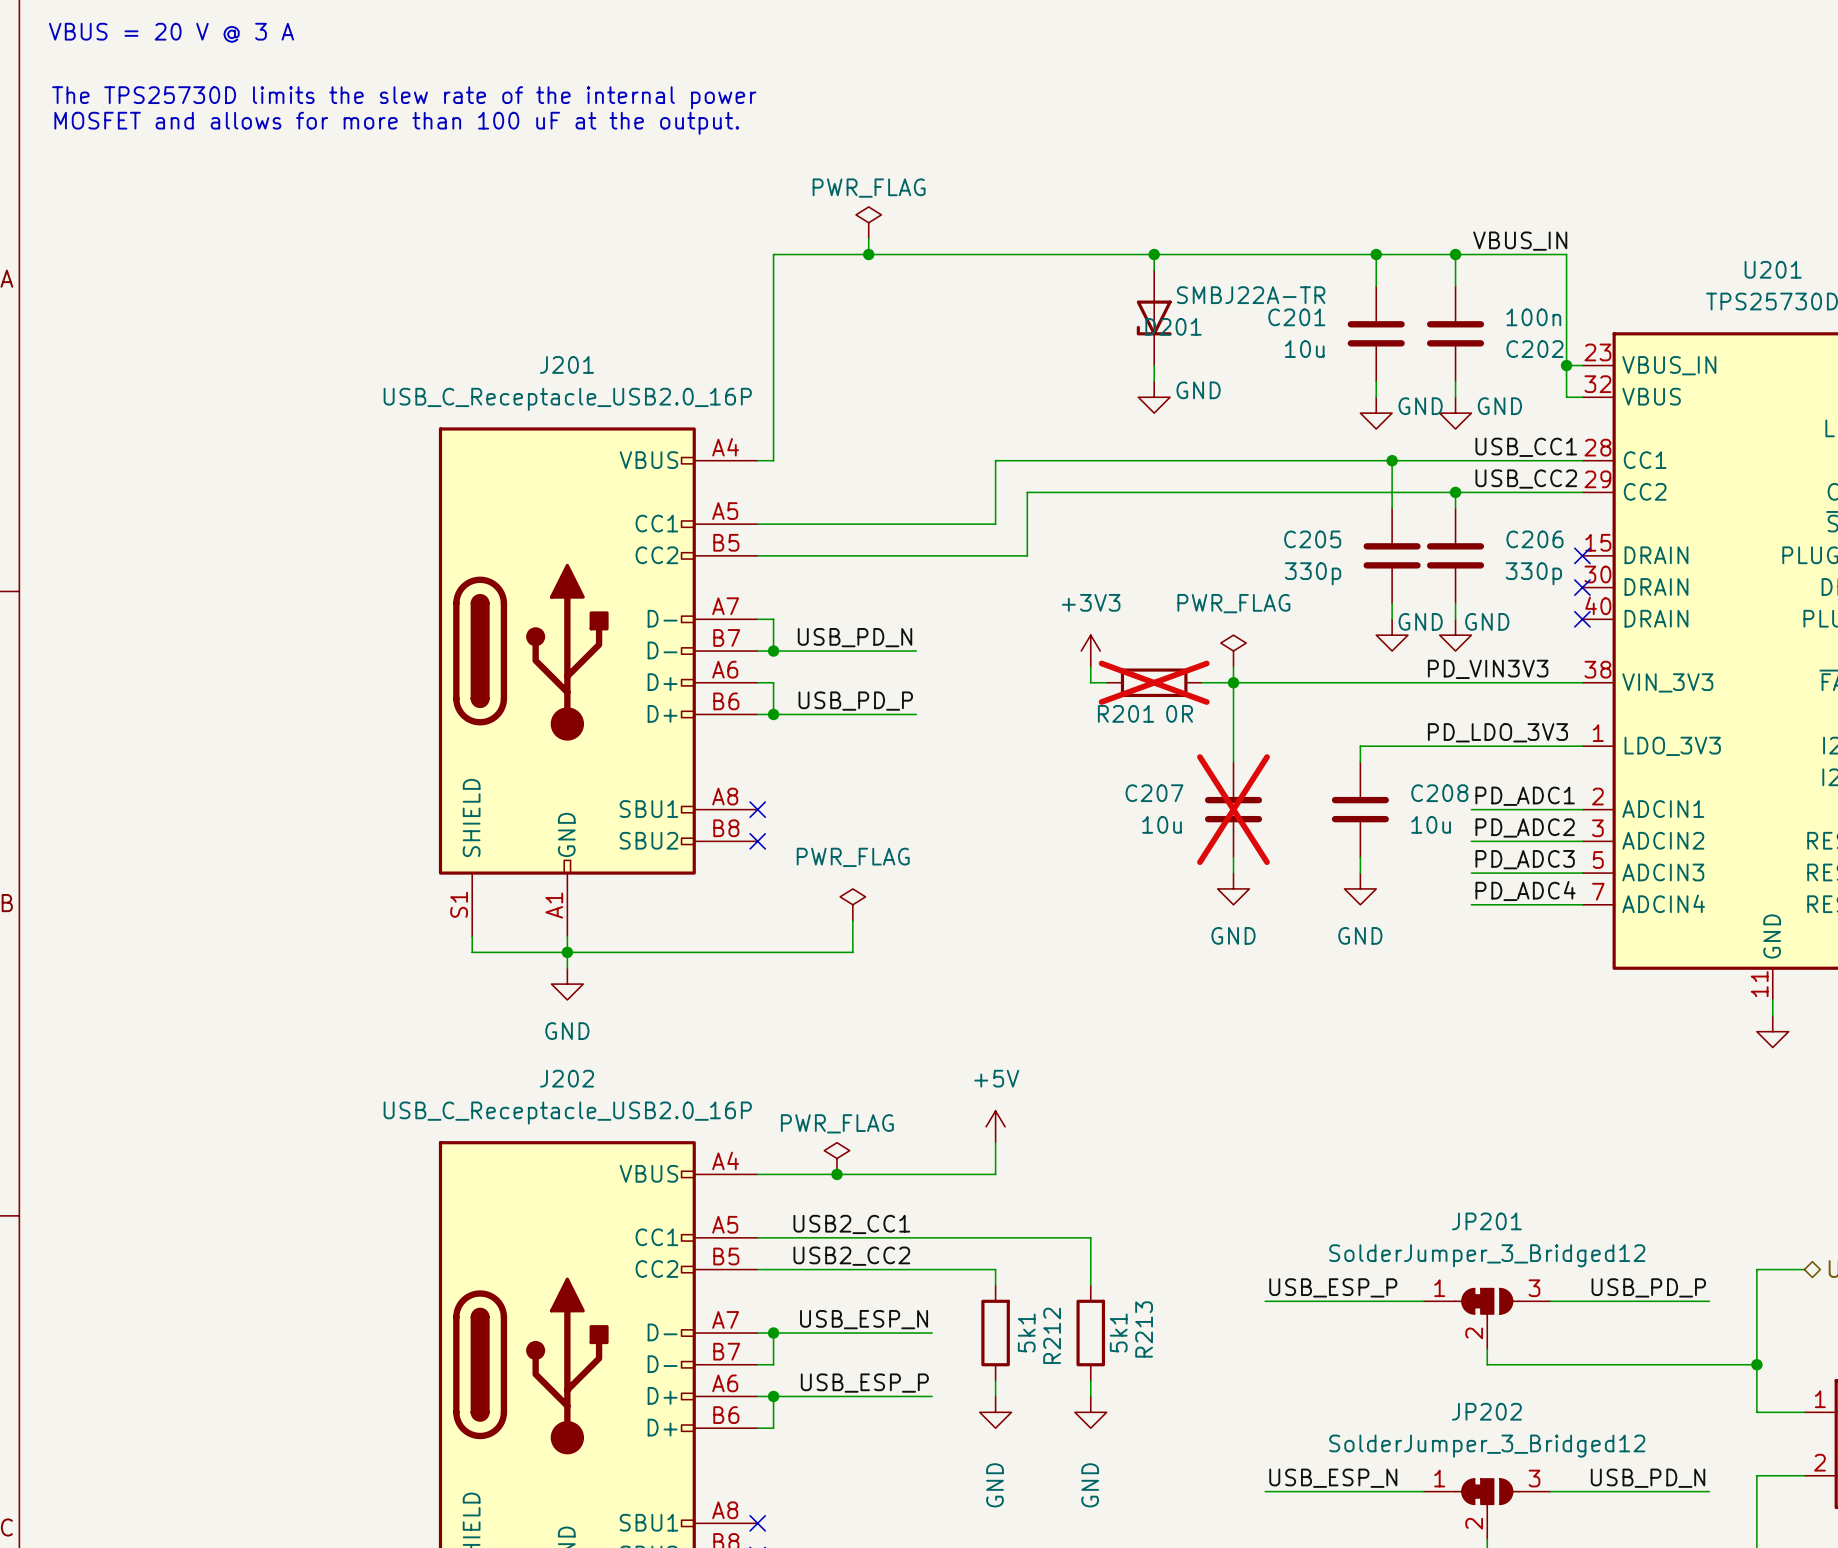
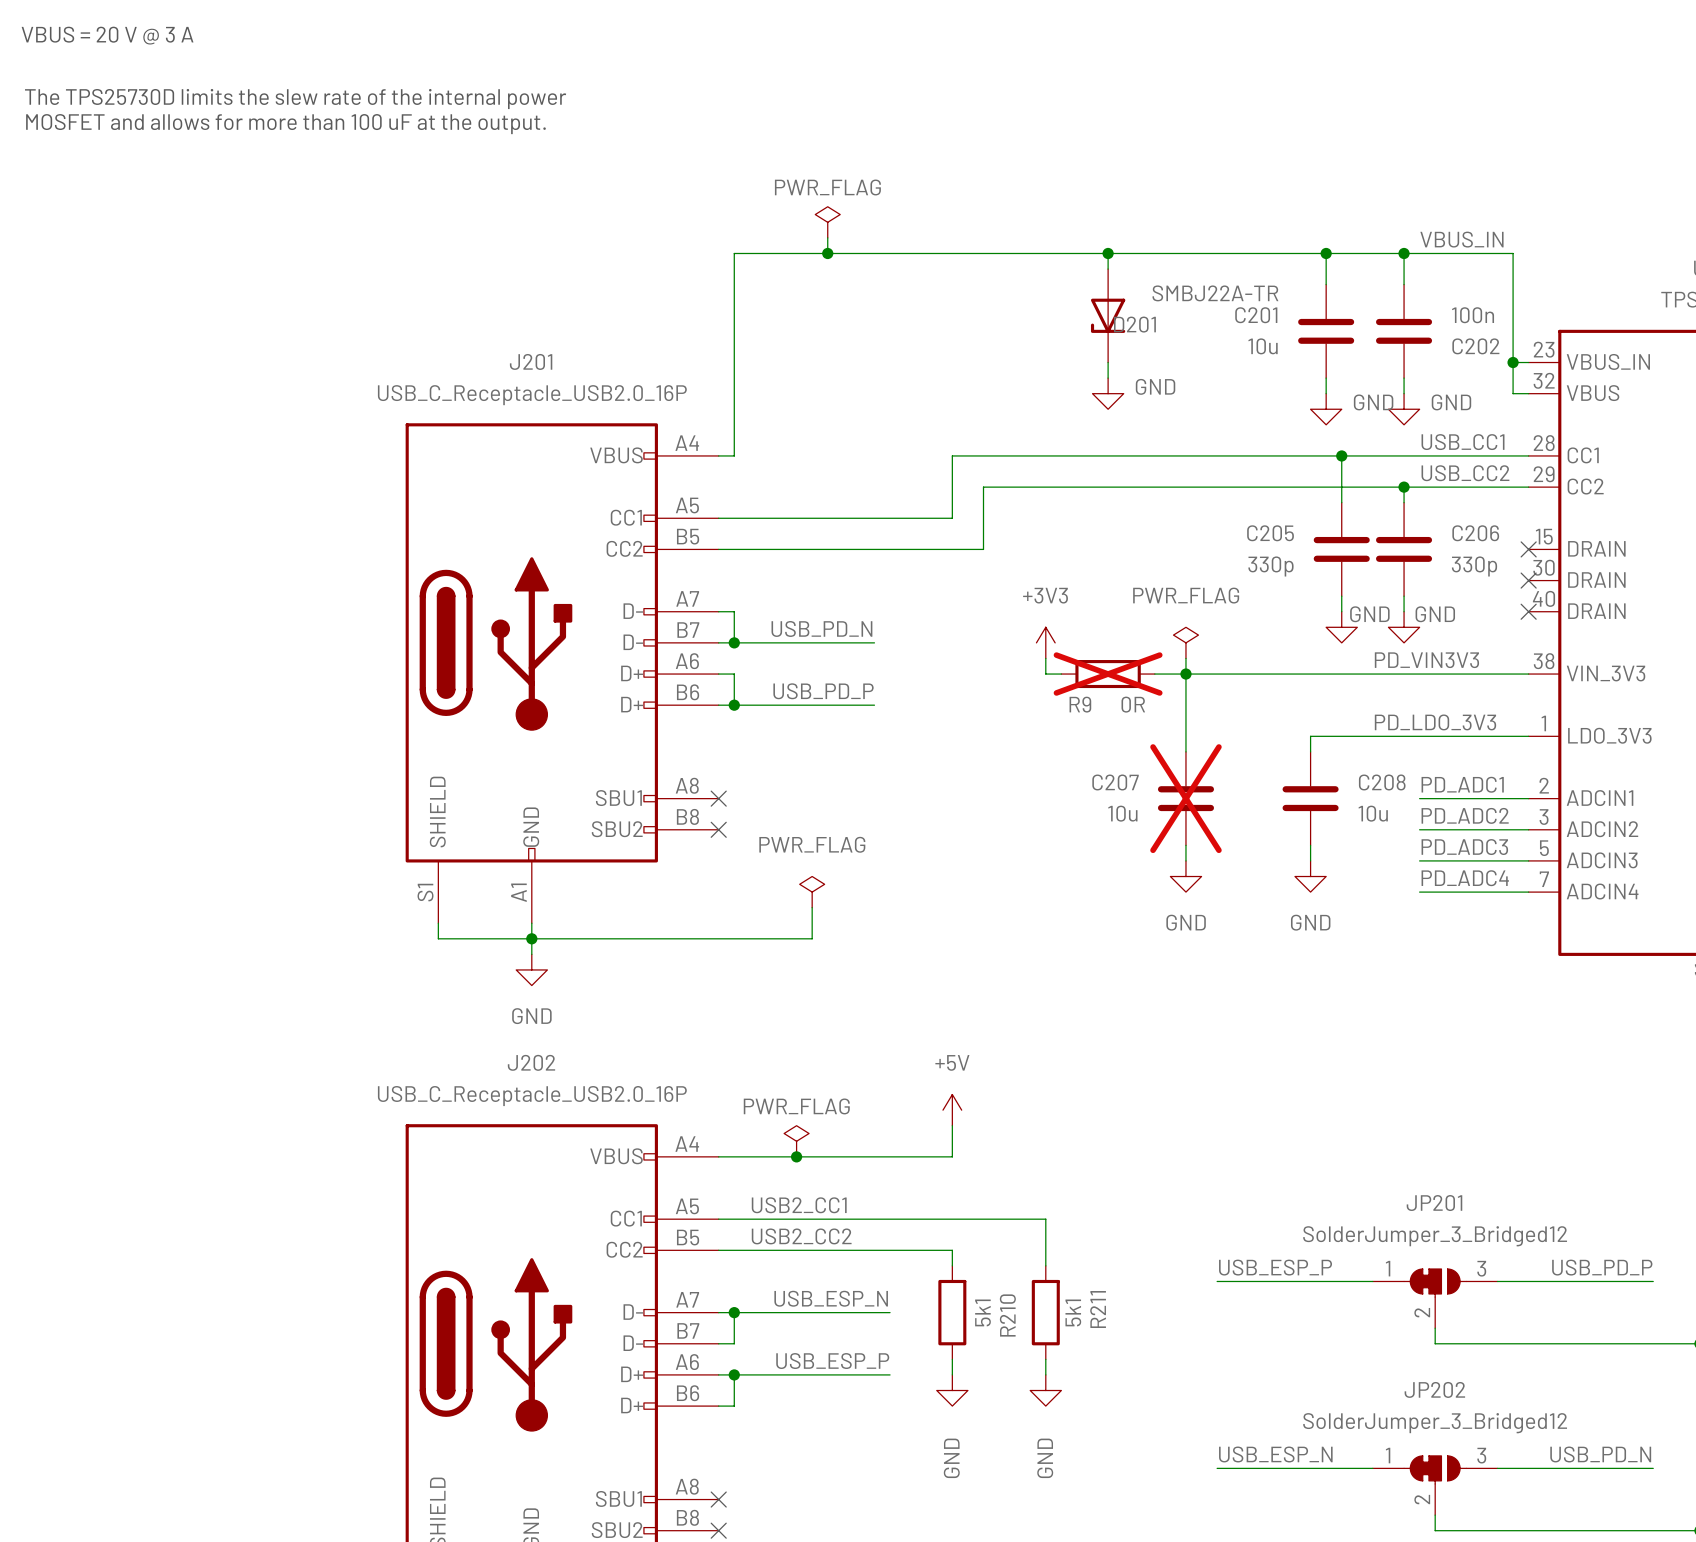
R201 name: R201 (1126, 713) -> R9 (1080, 704)
R213 name: R213 (1144, 1329) -> R211 (1098, 1309)
R212 name: R212 (1052, 1335) -> R210 (1007, 1315)

